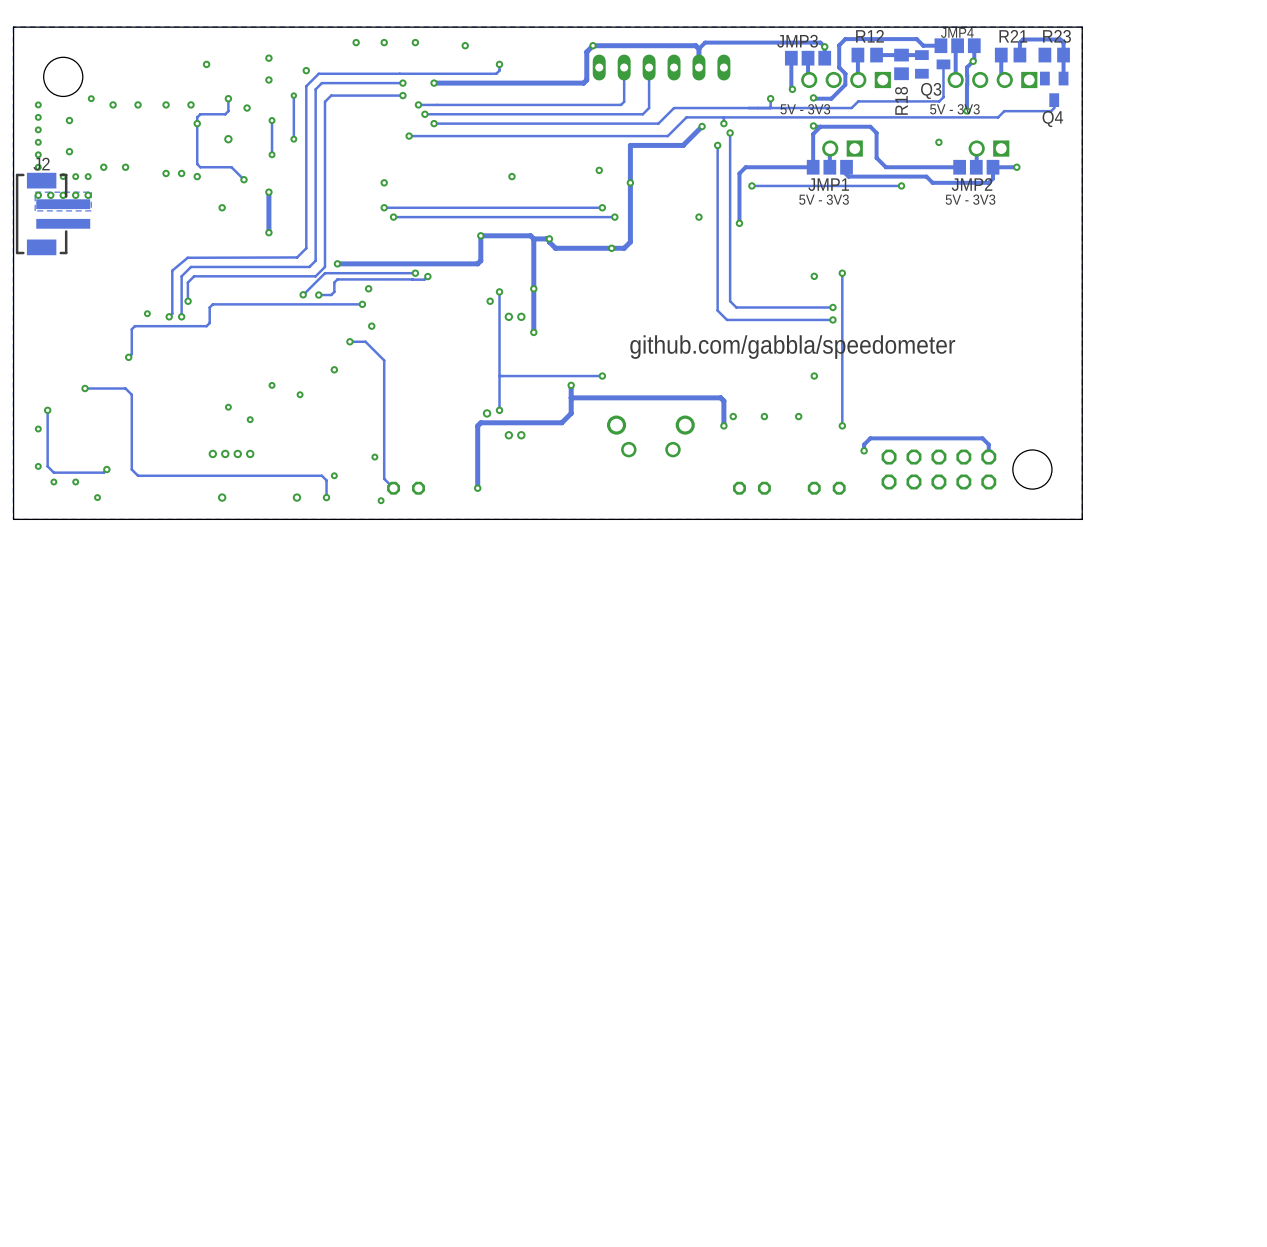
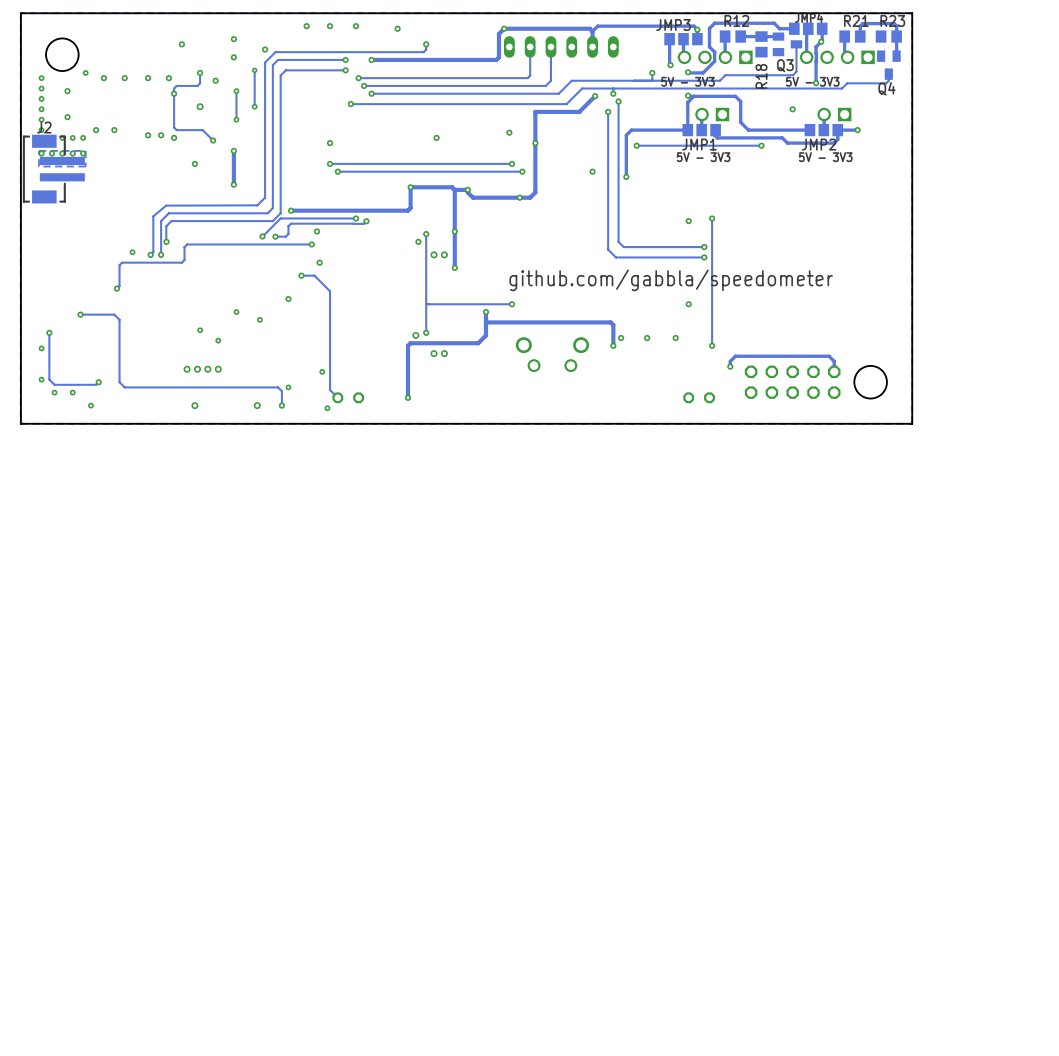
part: (751, 488) -> none

